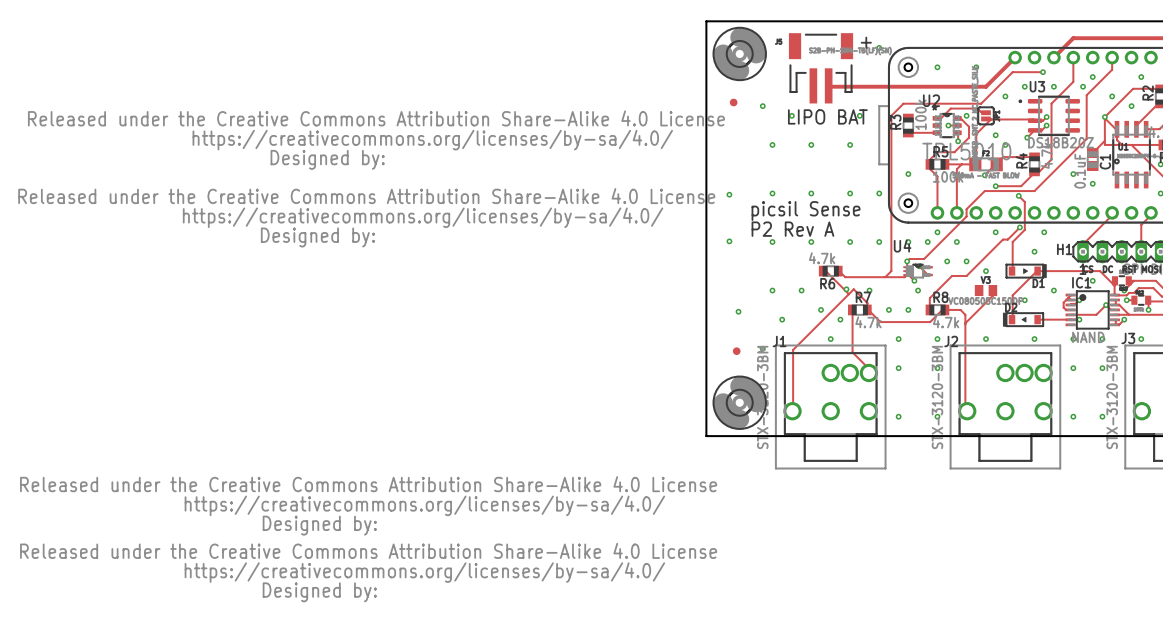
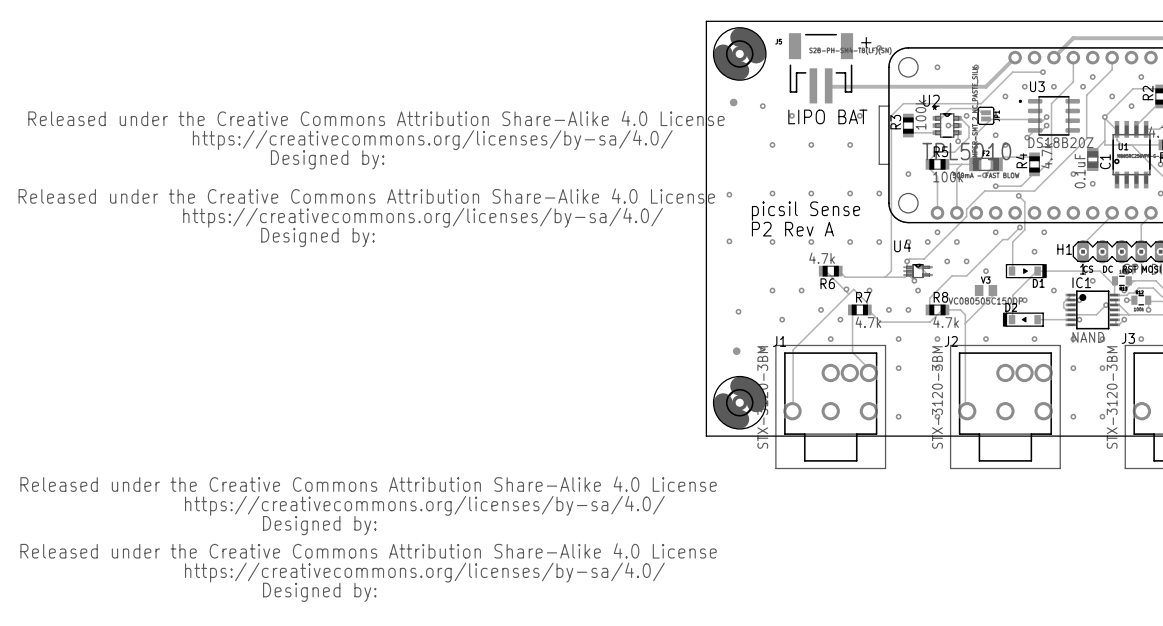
hole: (908, 67) -> none
hole: (908, 203) -> none

